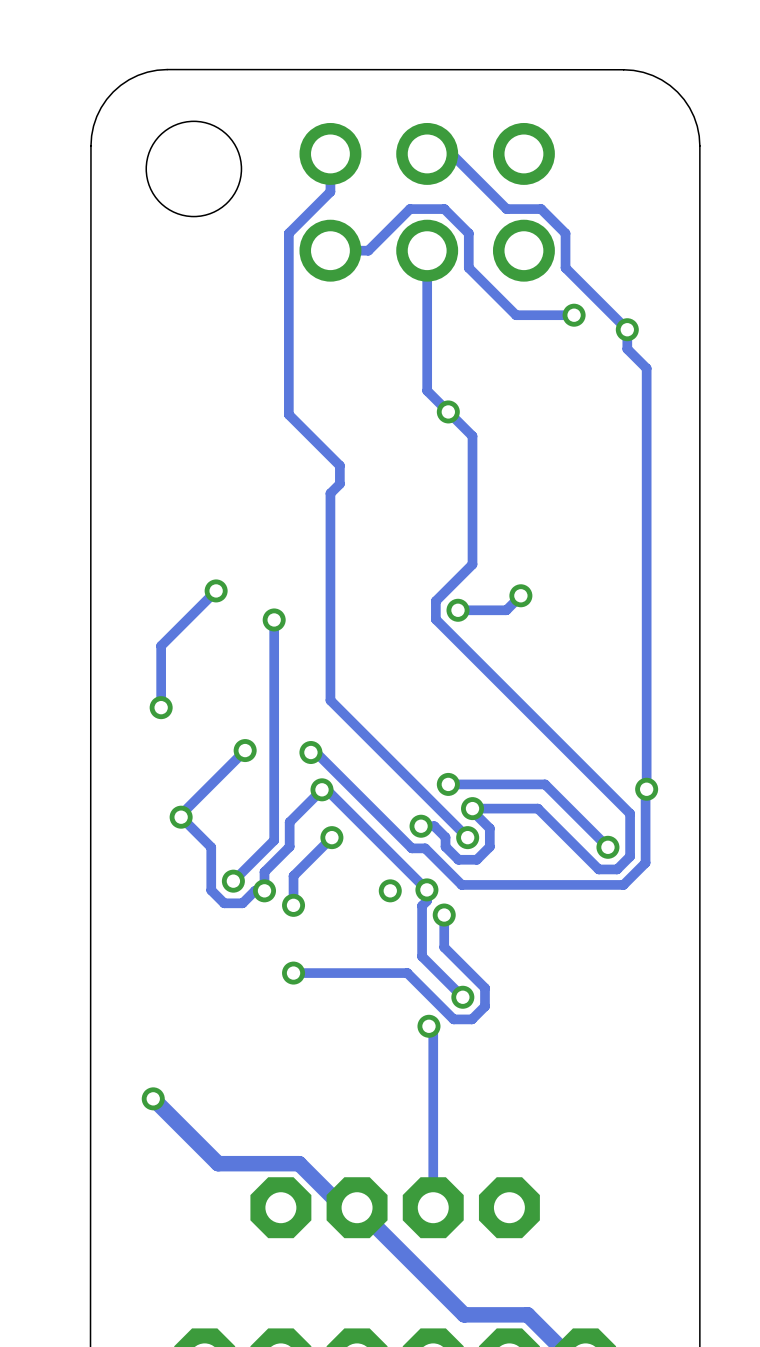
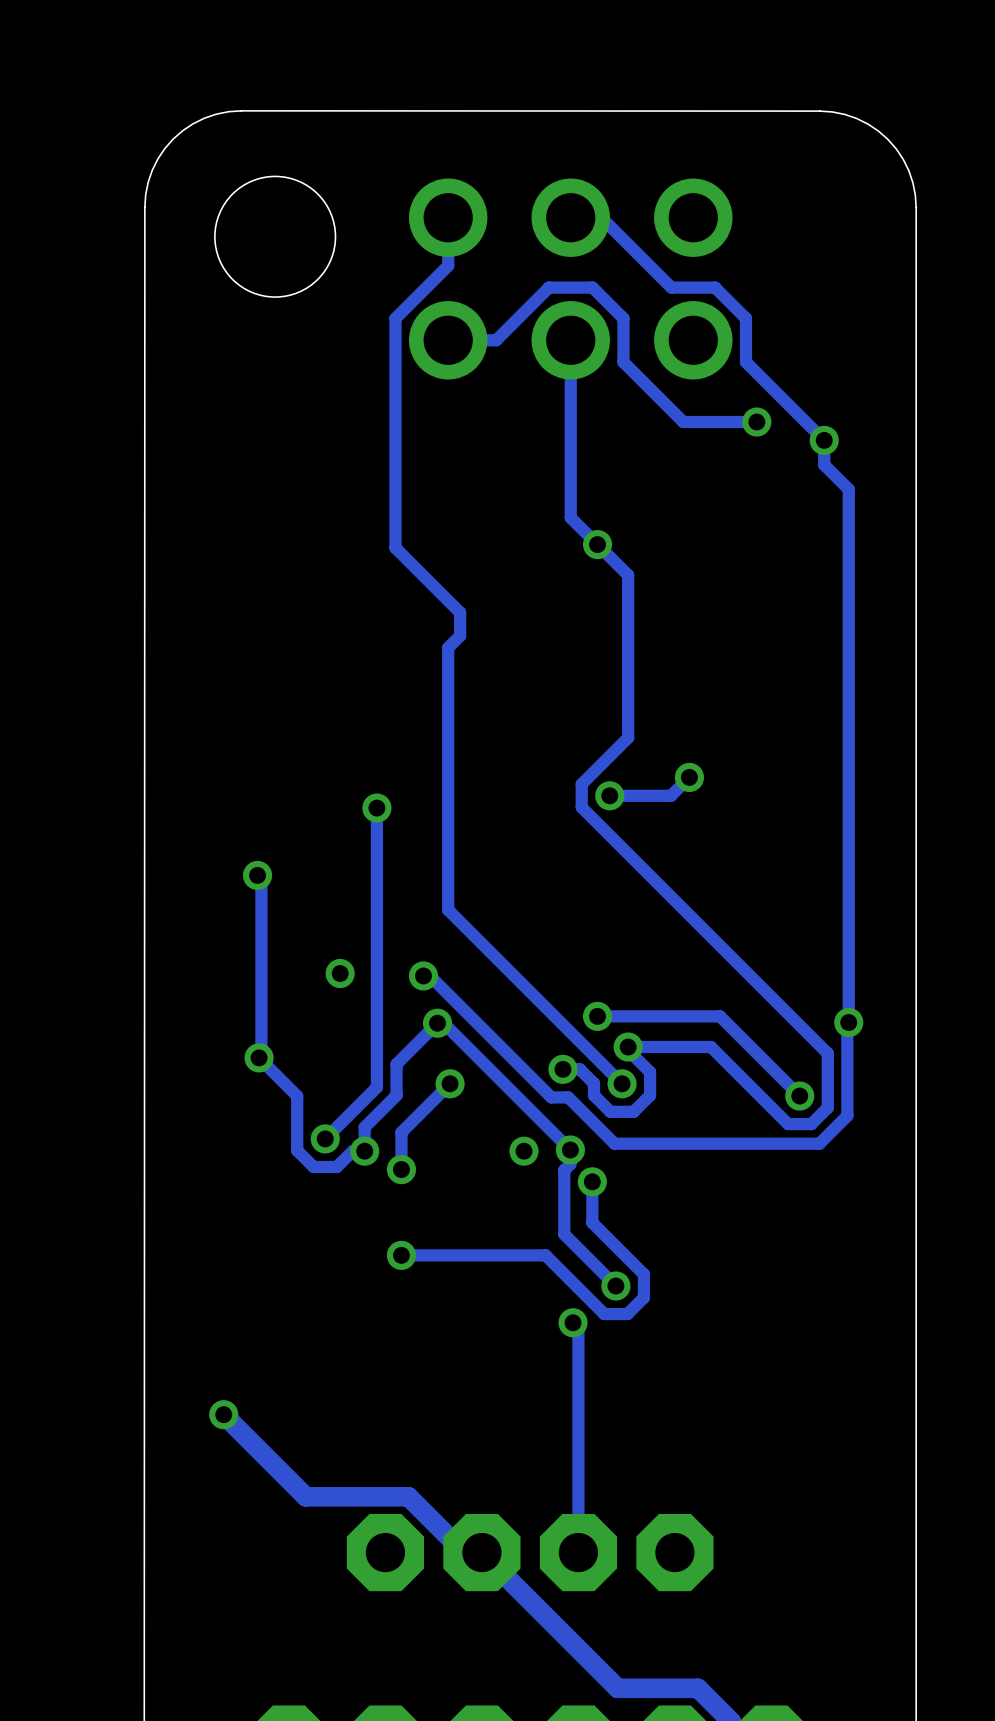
track: (216, 590) (161, 645) (161, 707) -> none
via: (216, 590) -> none
via position: (161, 707) -> (257, 875)
track: (245, 750) (181, 814) (183, 819) -> (257, 875) (261, 879) (261, 1060)

